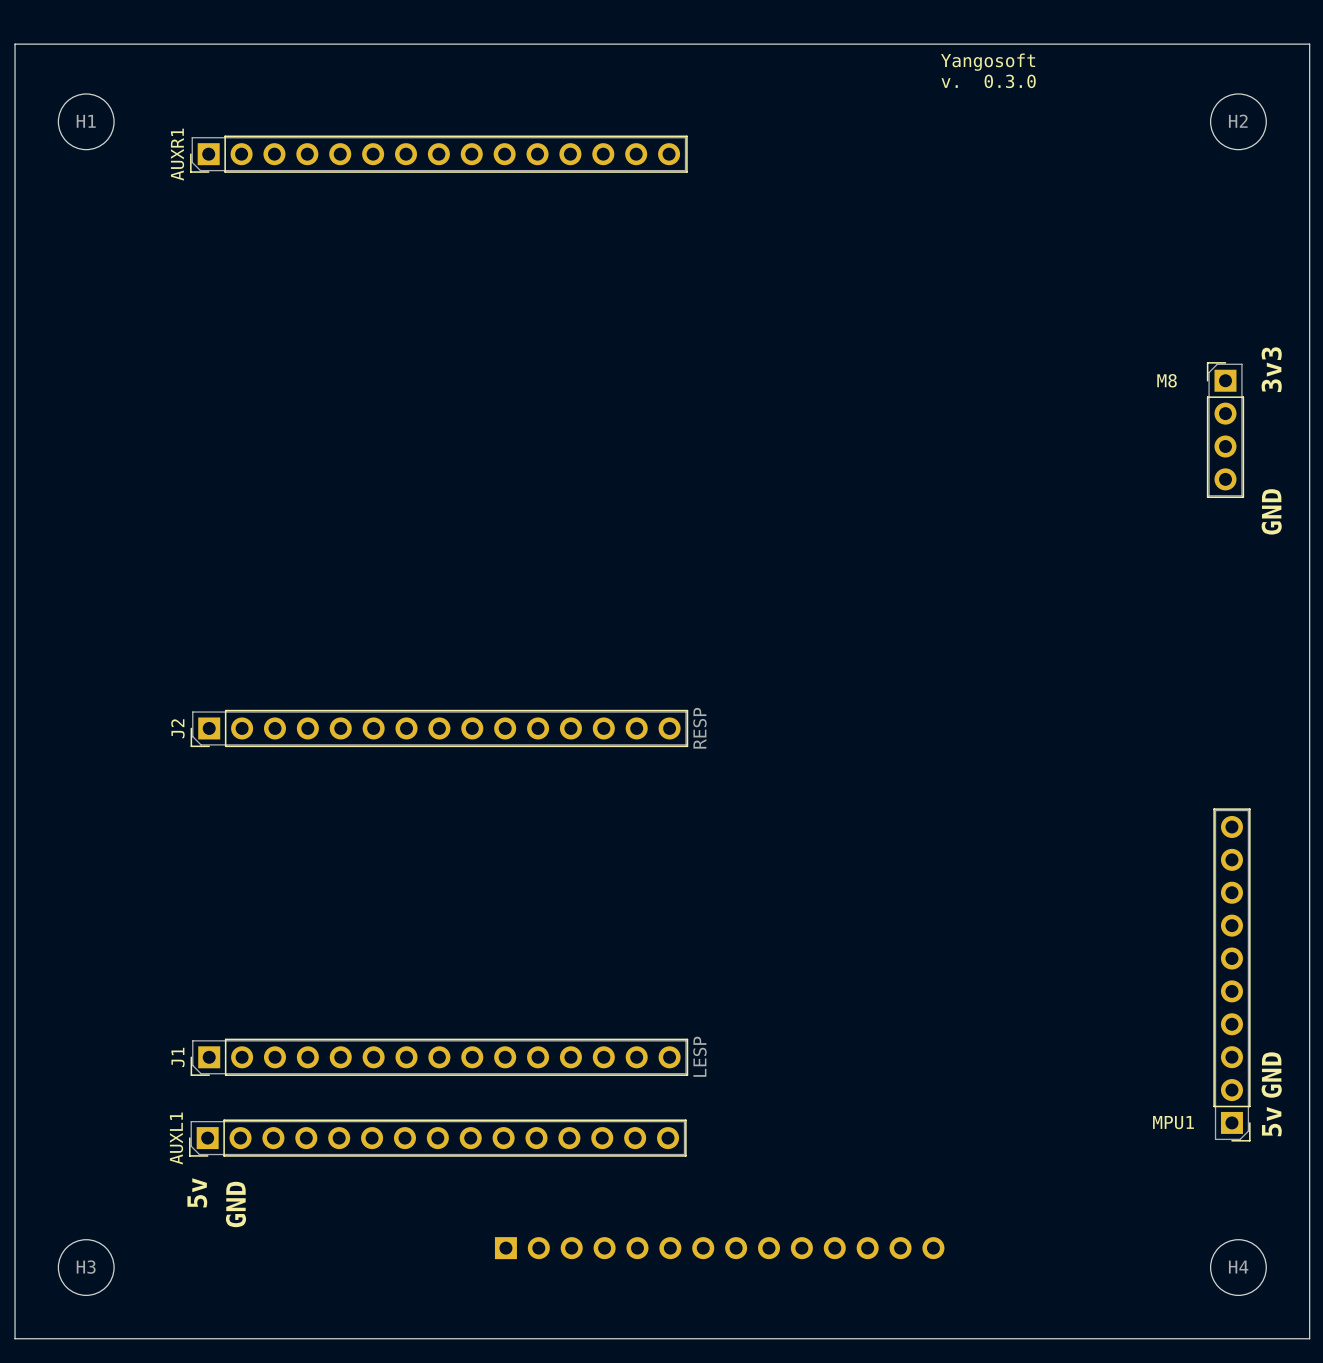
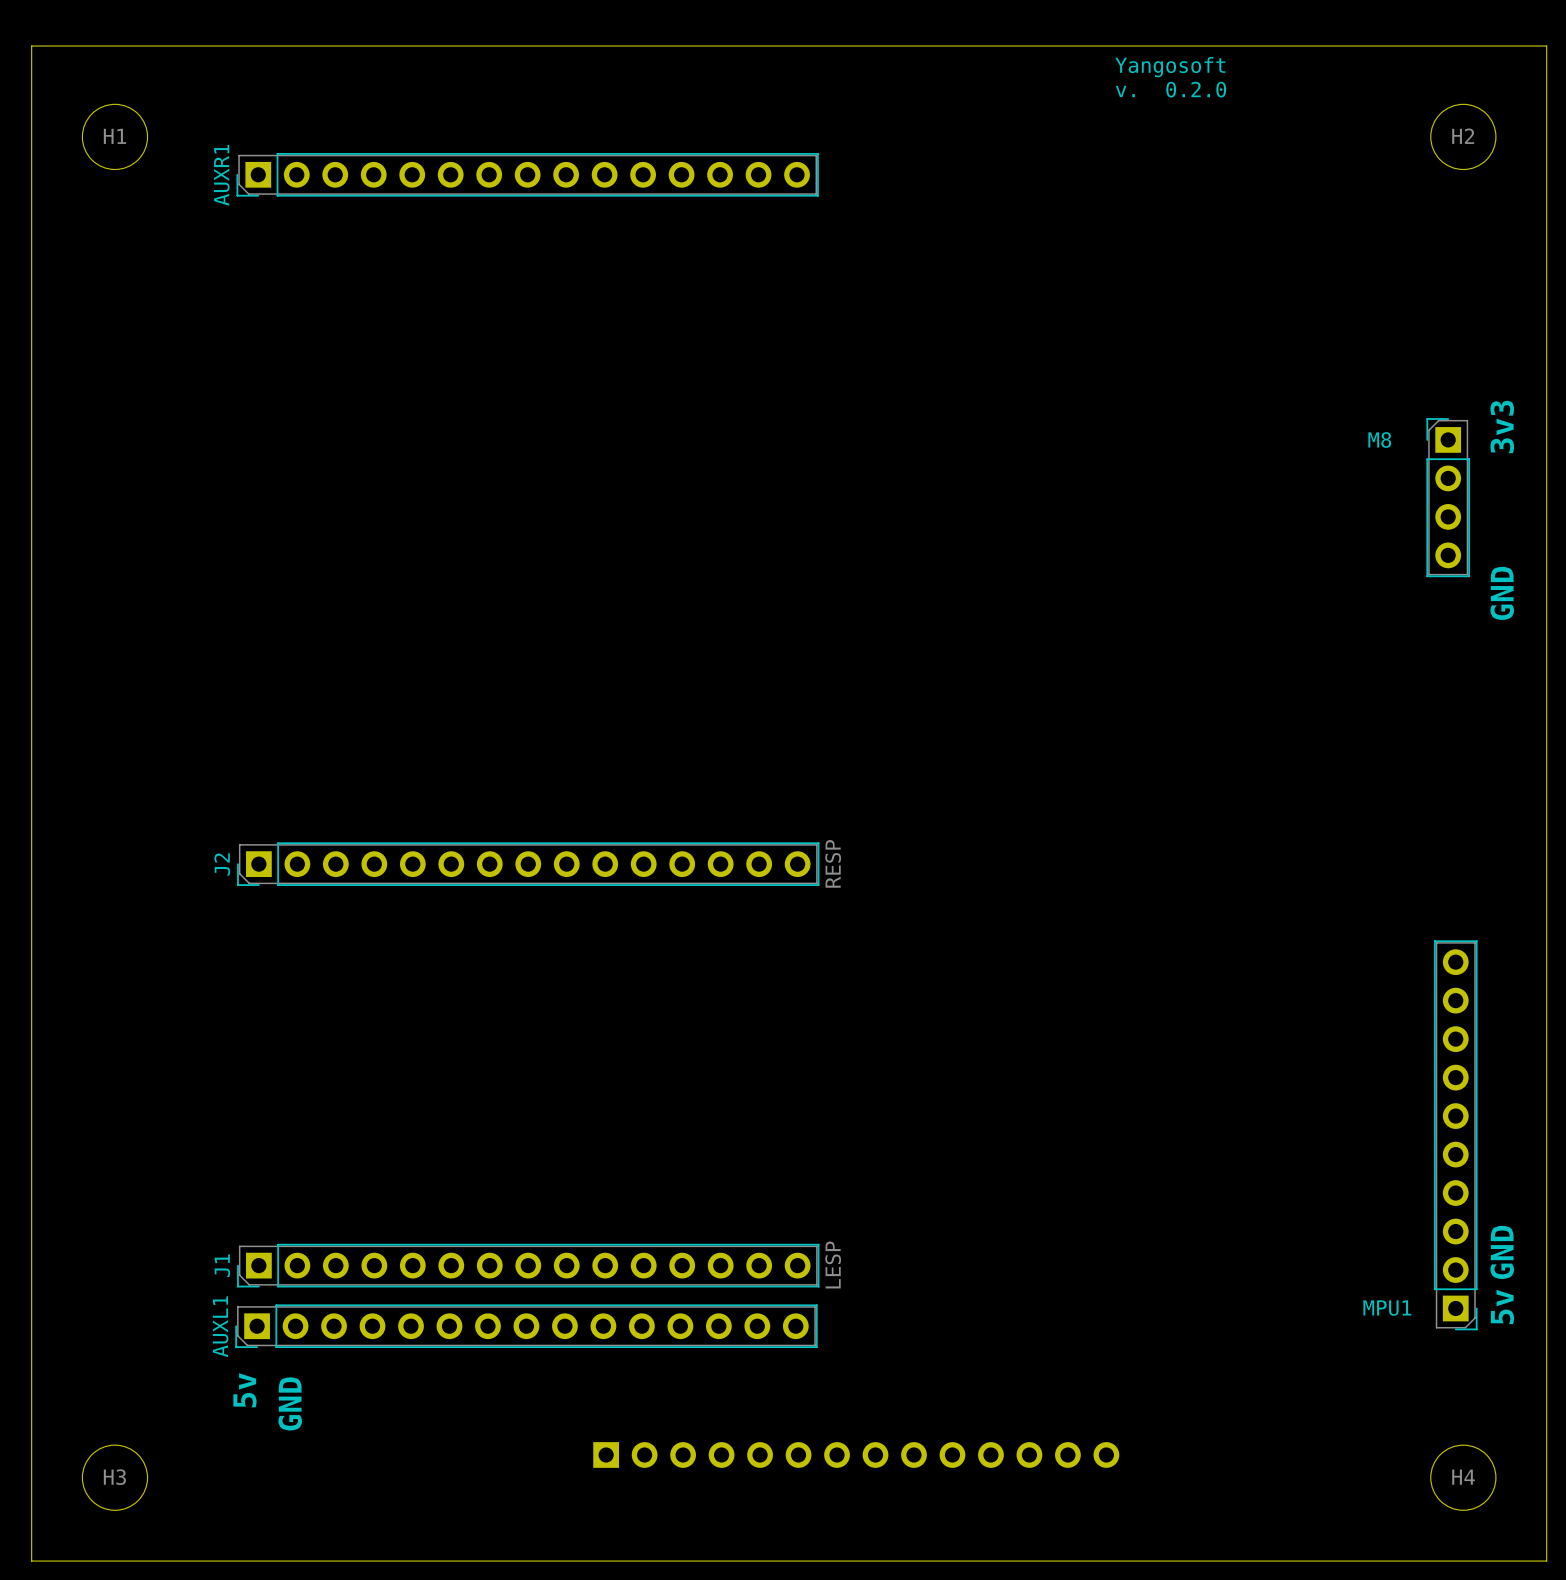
text: v. 0.3.0 (988, 81) -> v. 0.2.0 (1171, 89)
J2 position: (439, 728) -> (528, 864)
J1 position: (439, 1057) -> (528, 1265)

